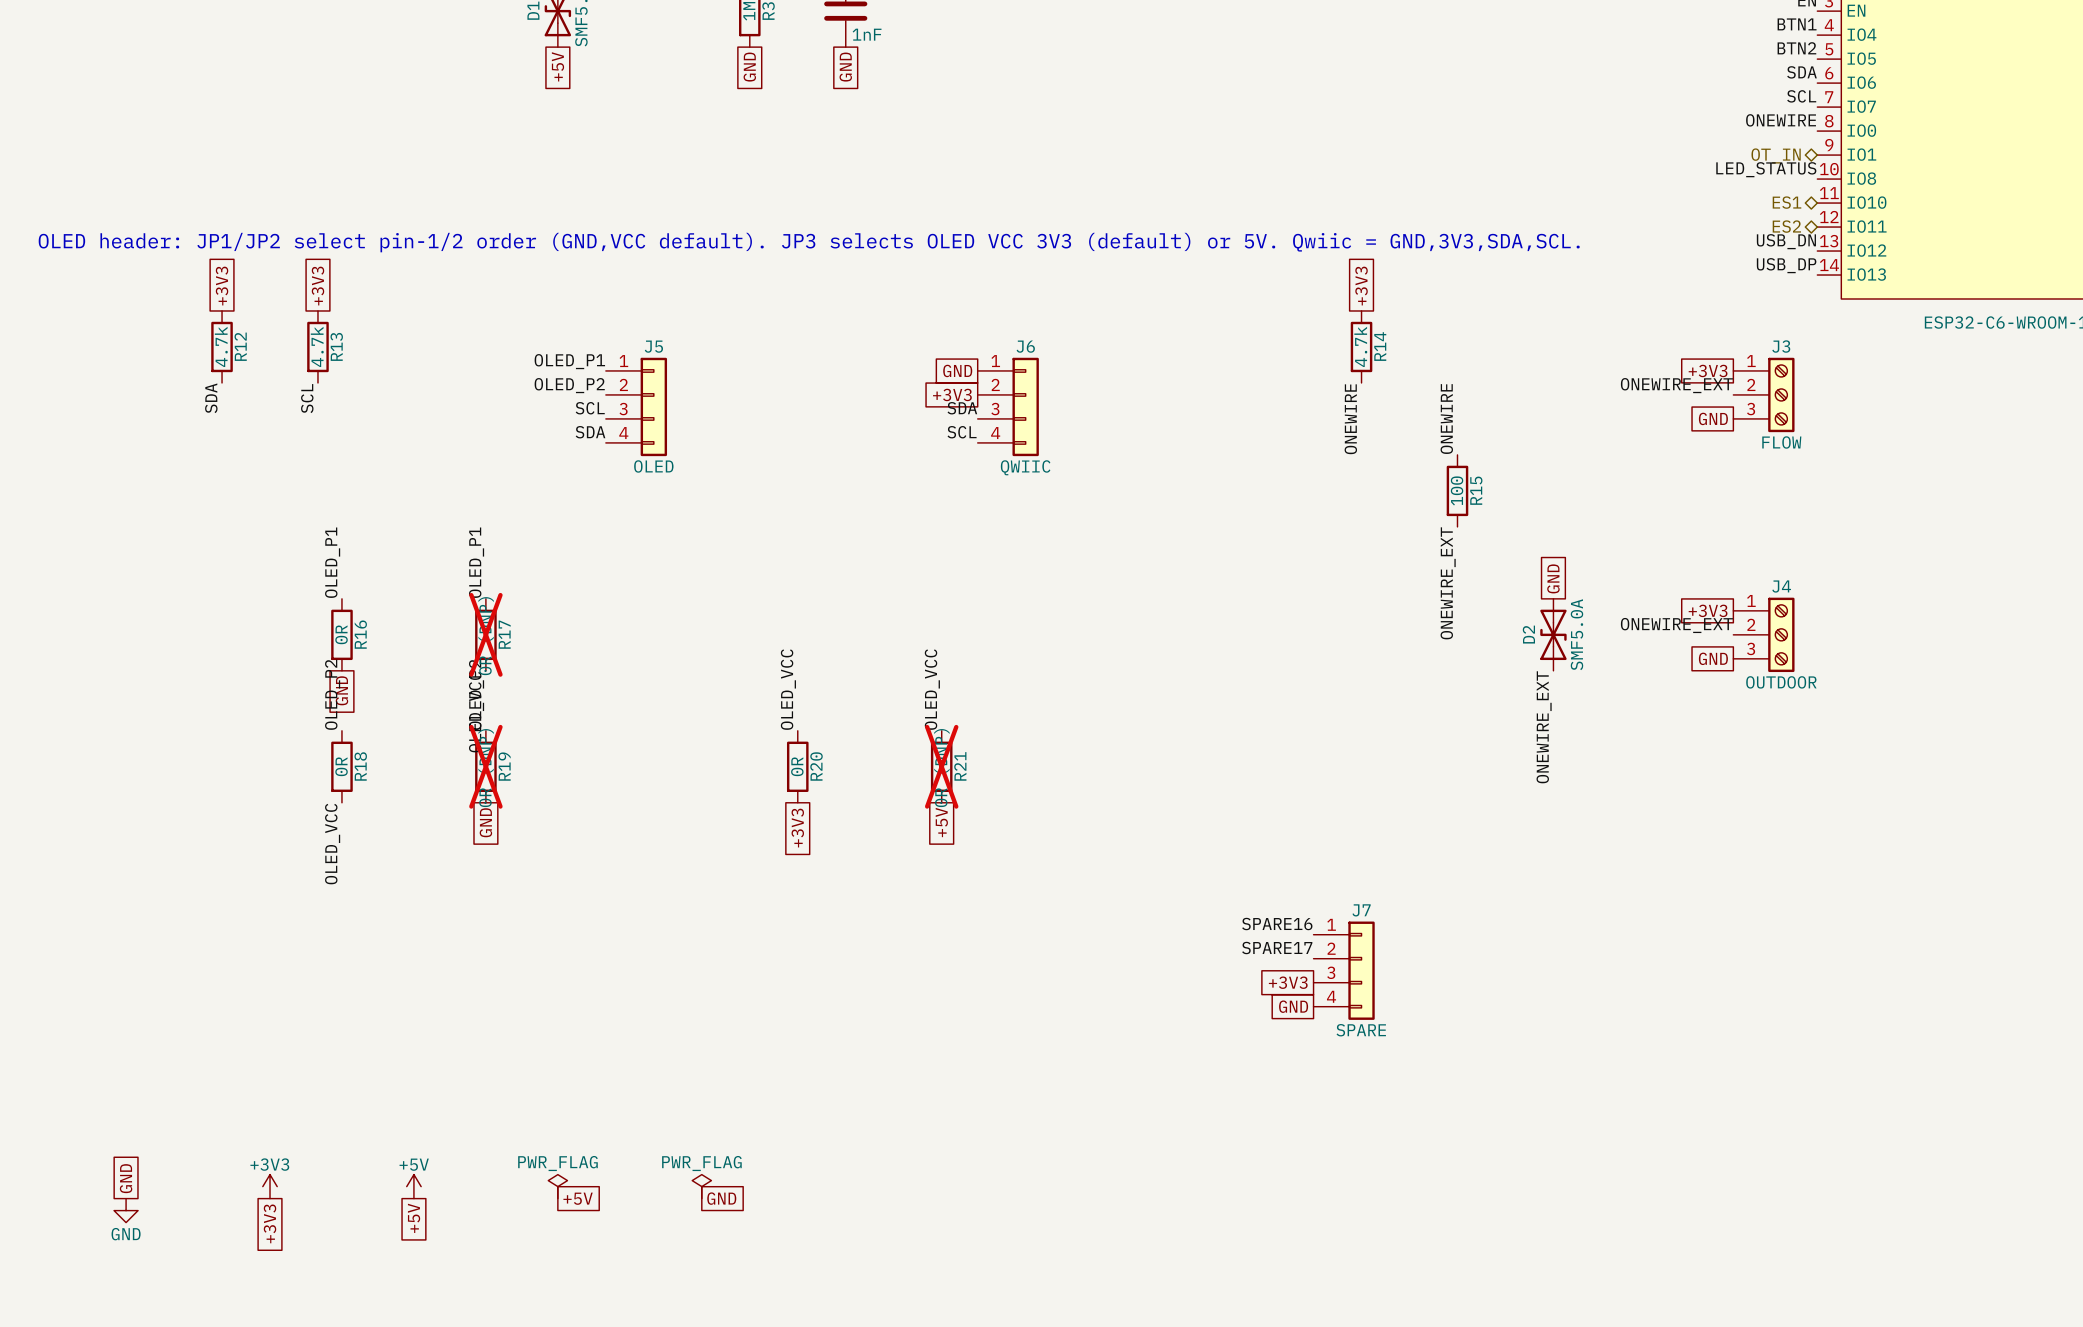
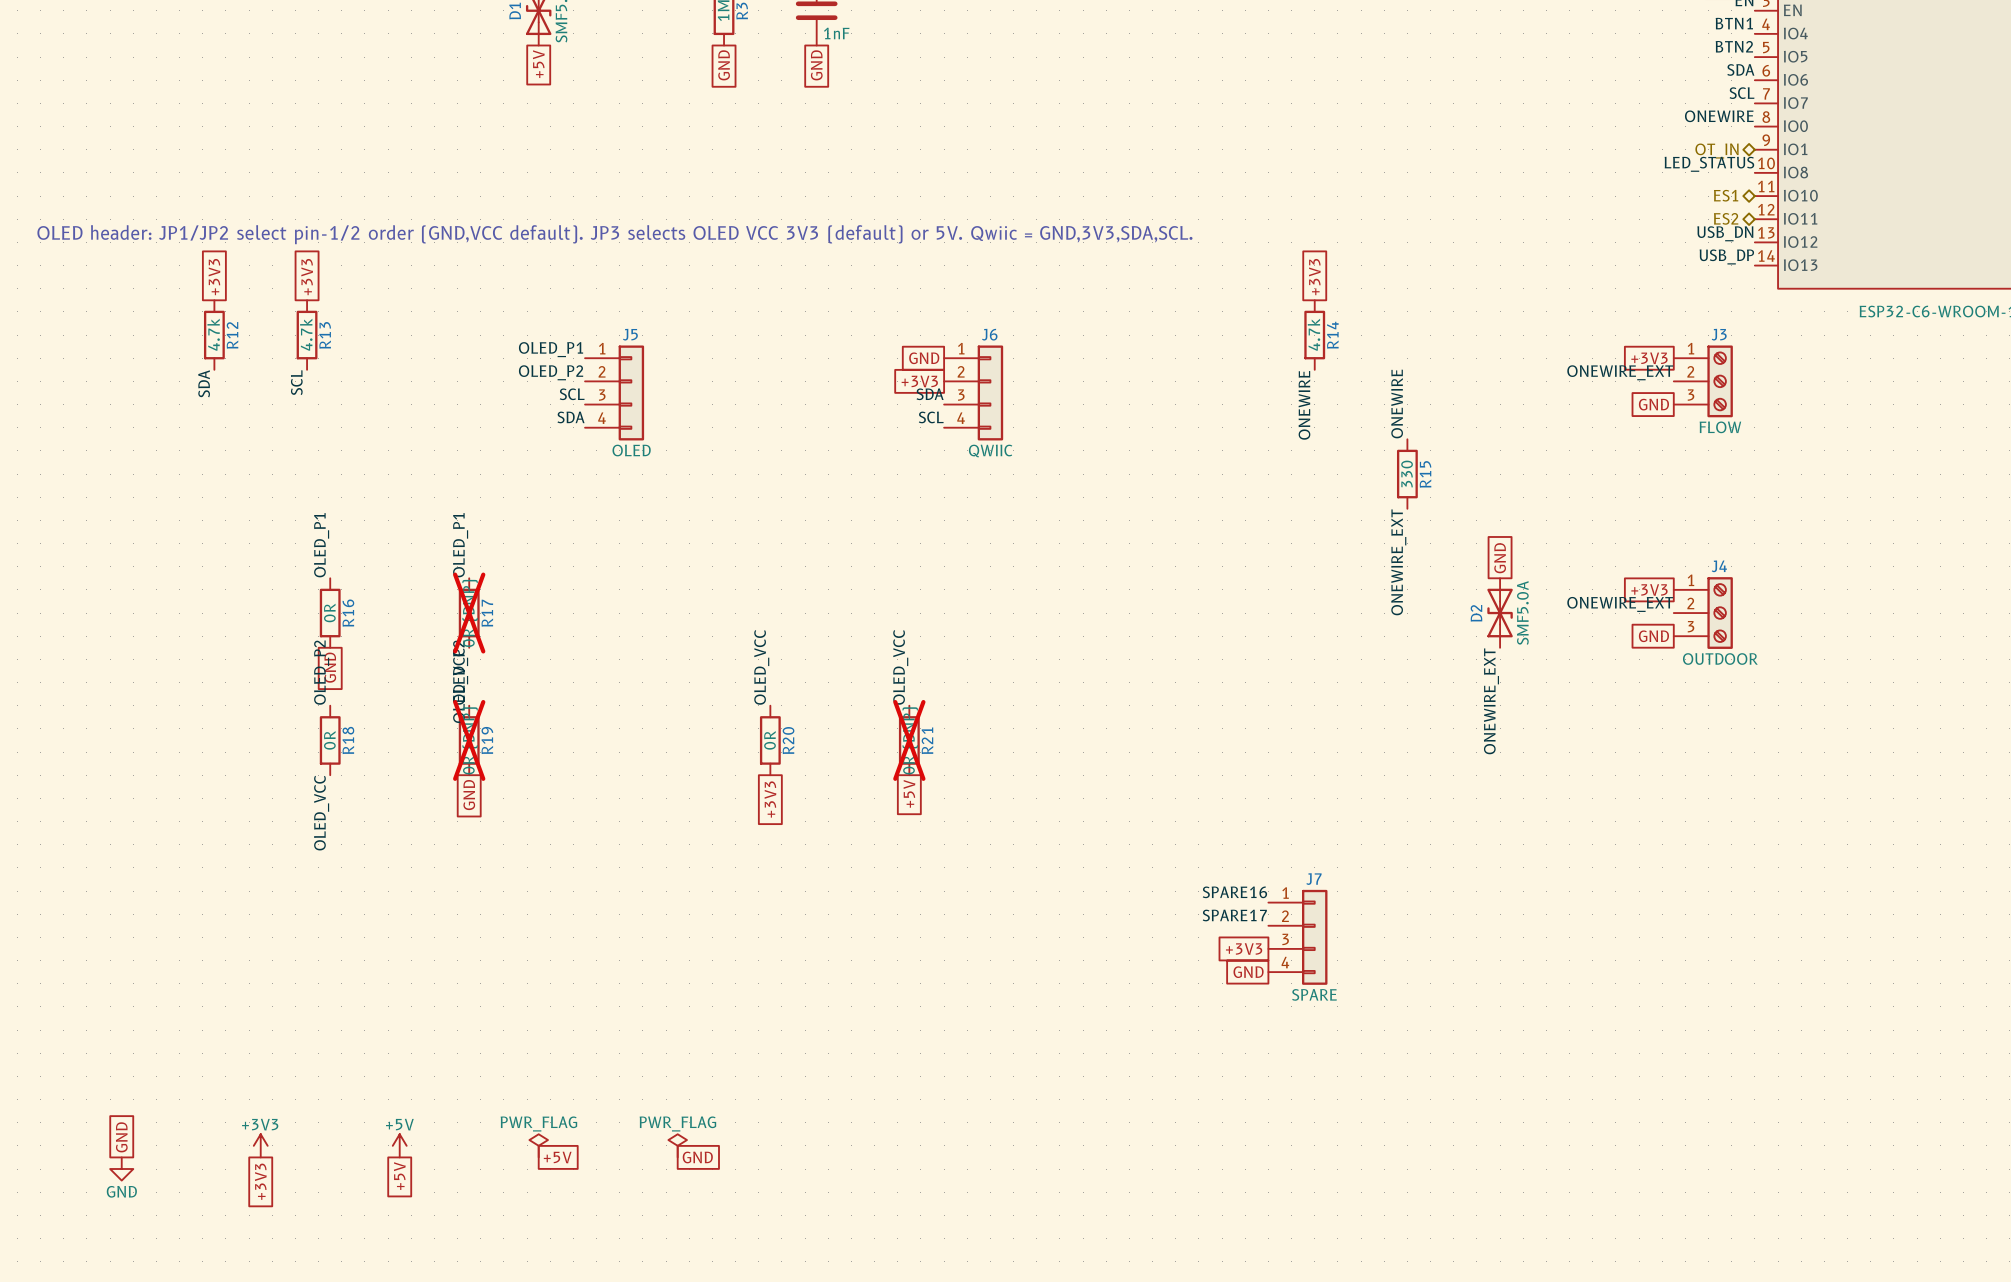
R15 value: 100 (1457, 490) -> 330 (1407, 474)

